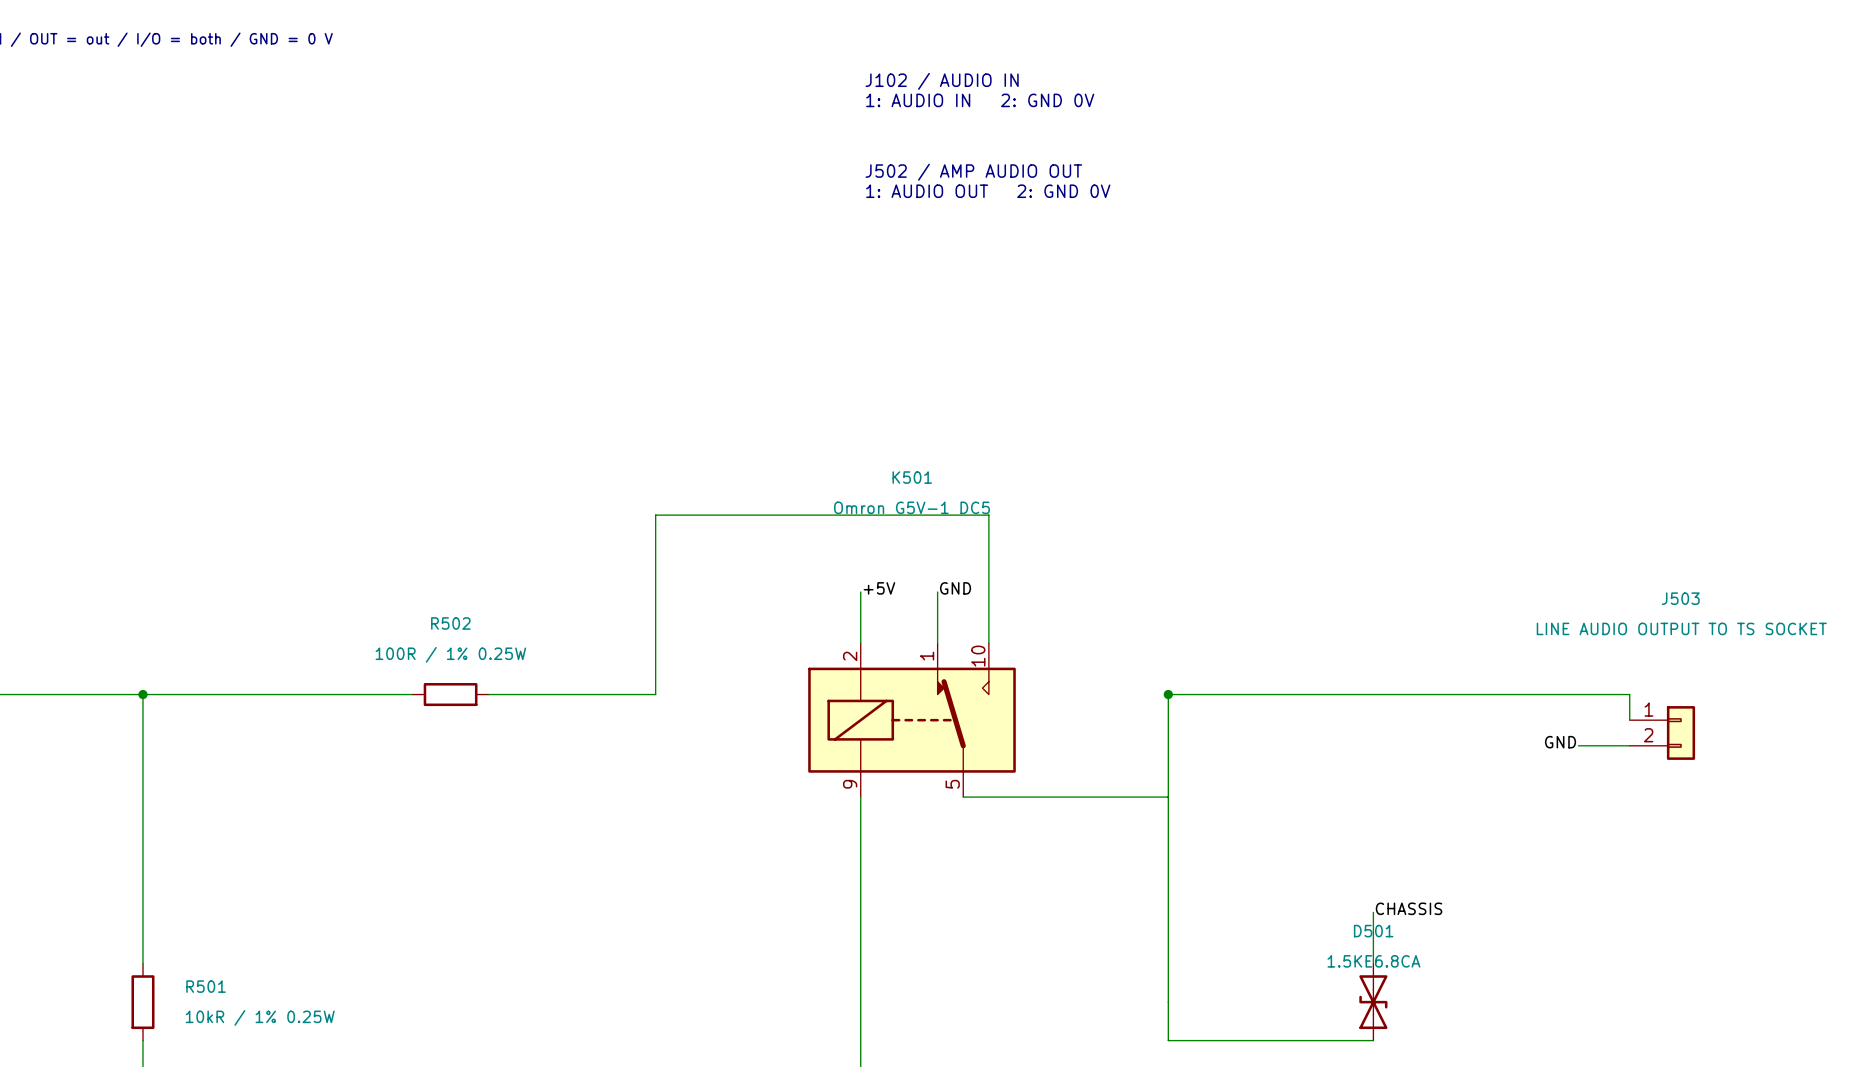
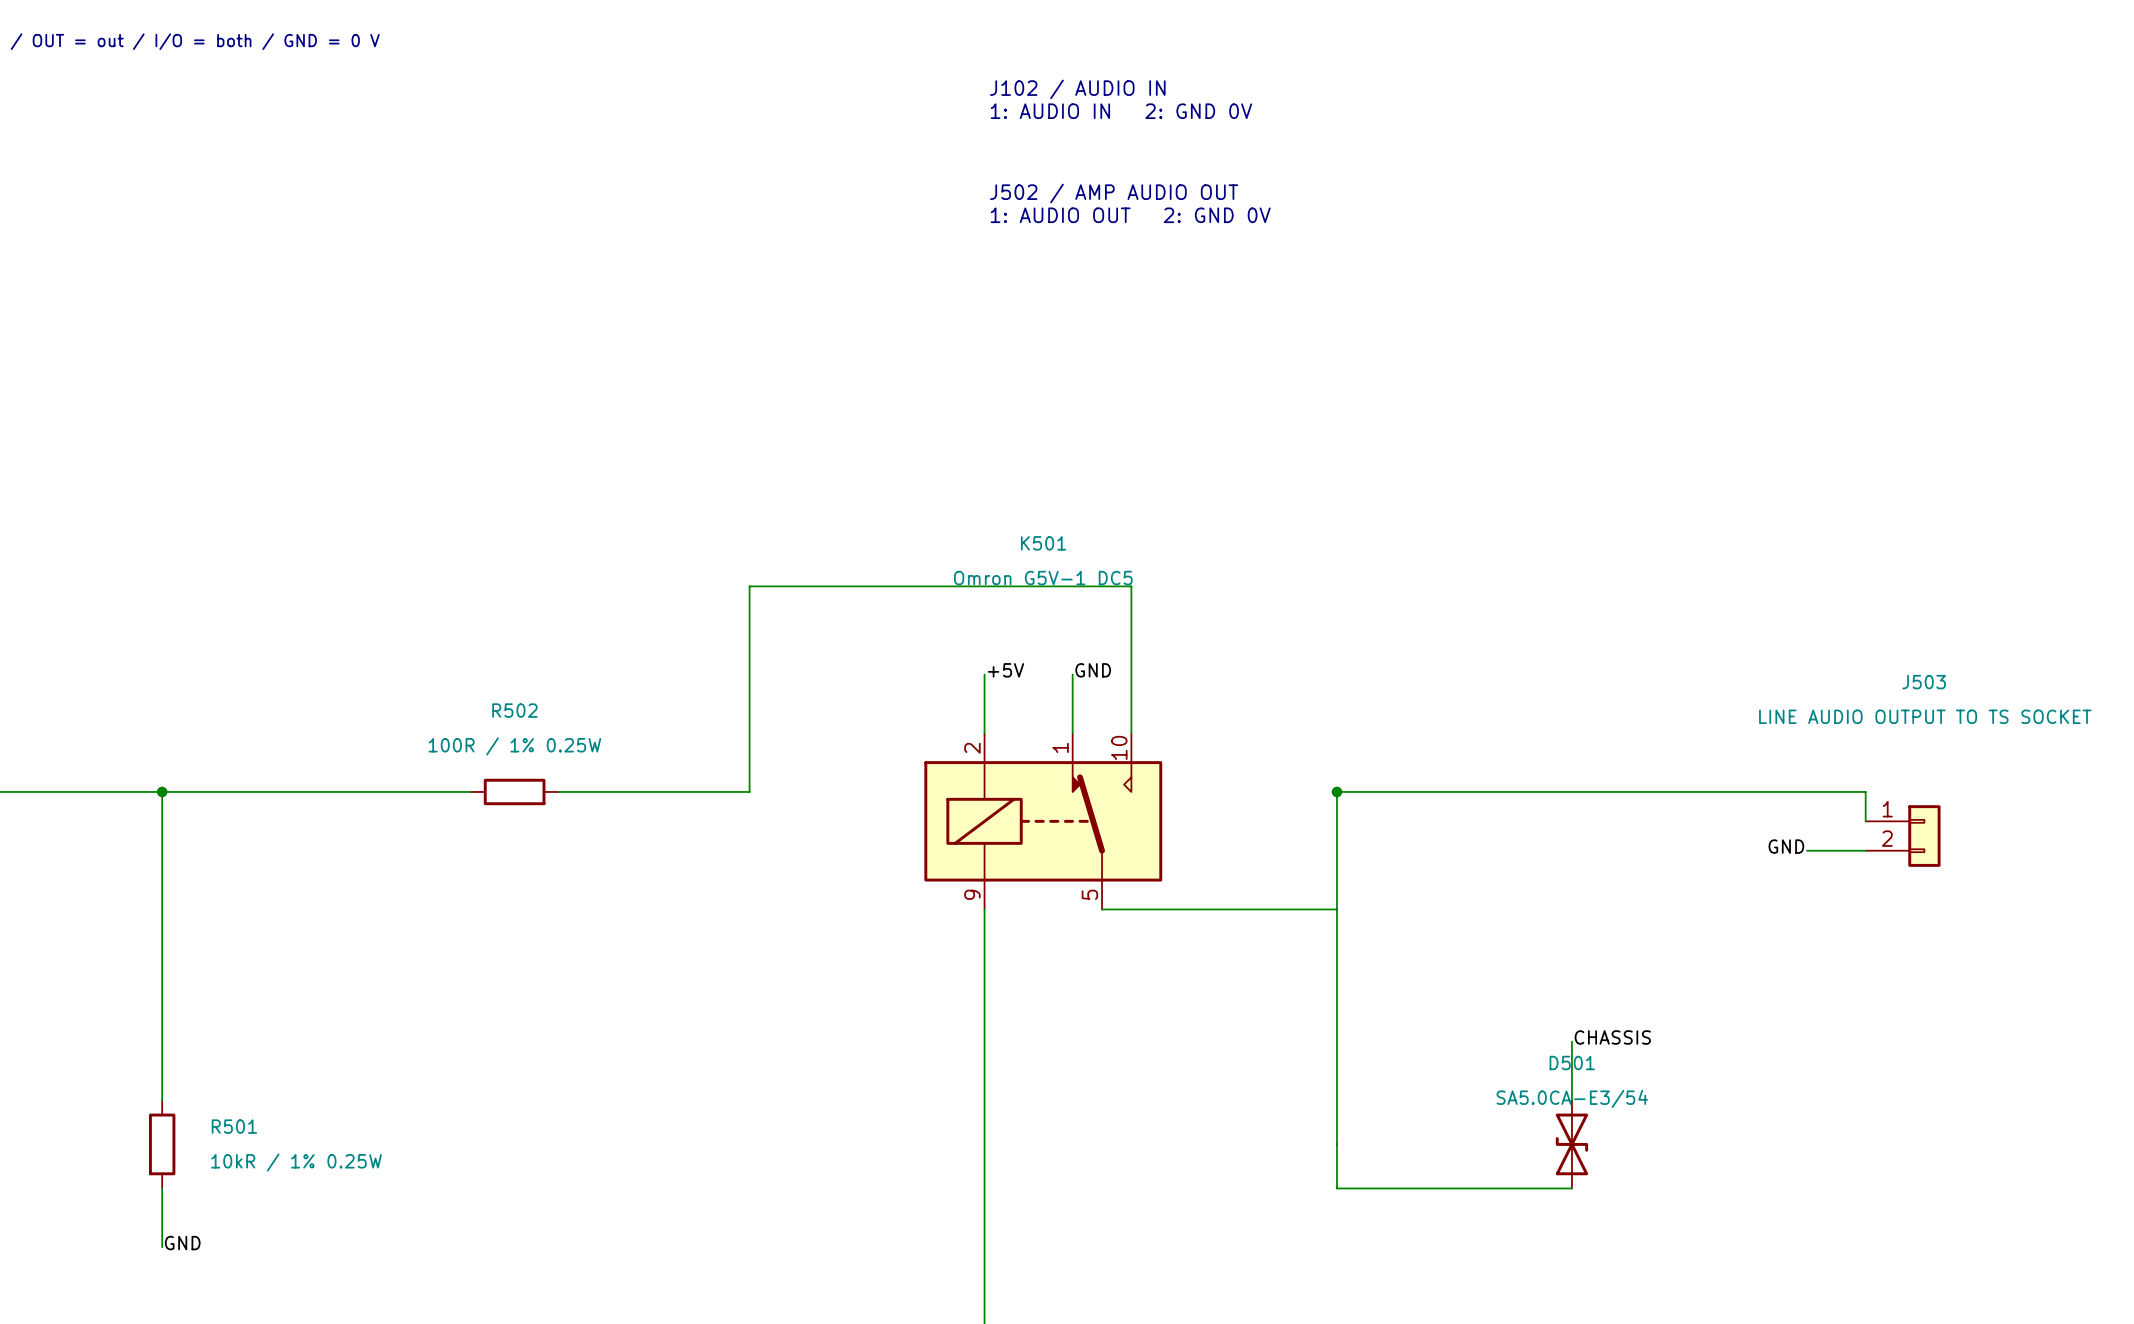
D501 value: 1.5KE6.8CA (1373, 961) -> SA5.0CA-E3/54 (1572, 1098)

